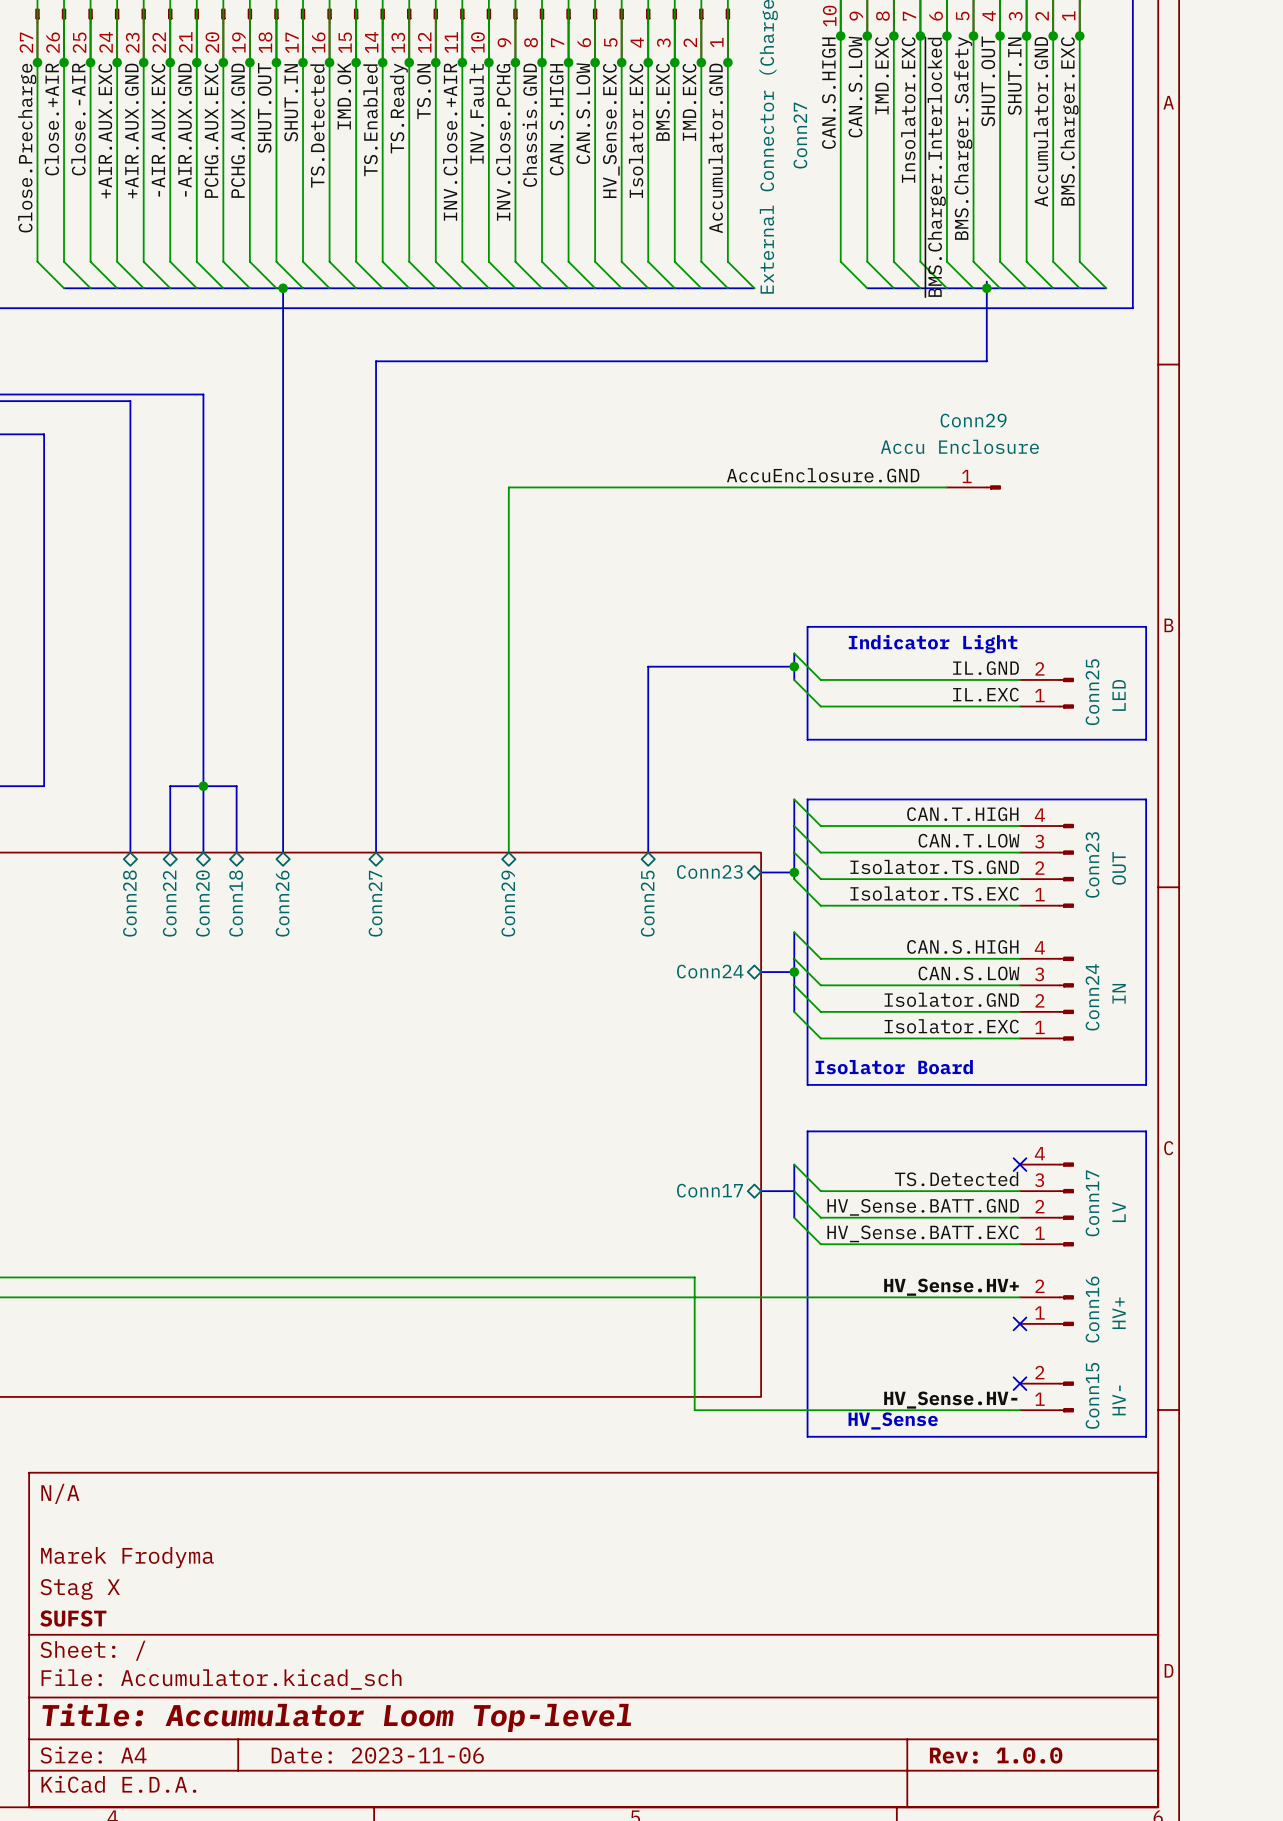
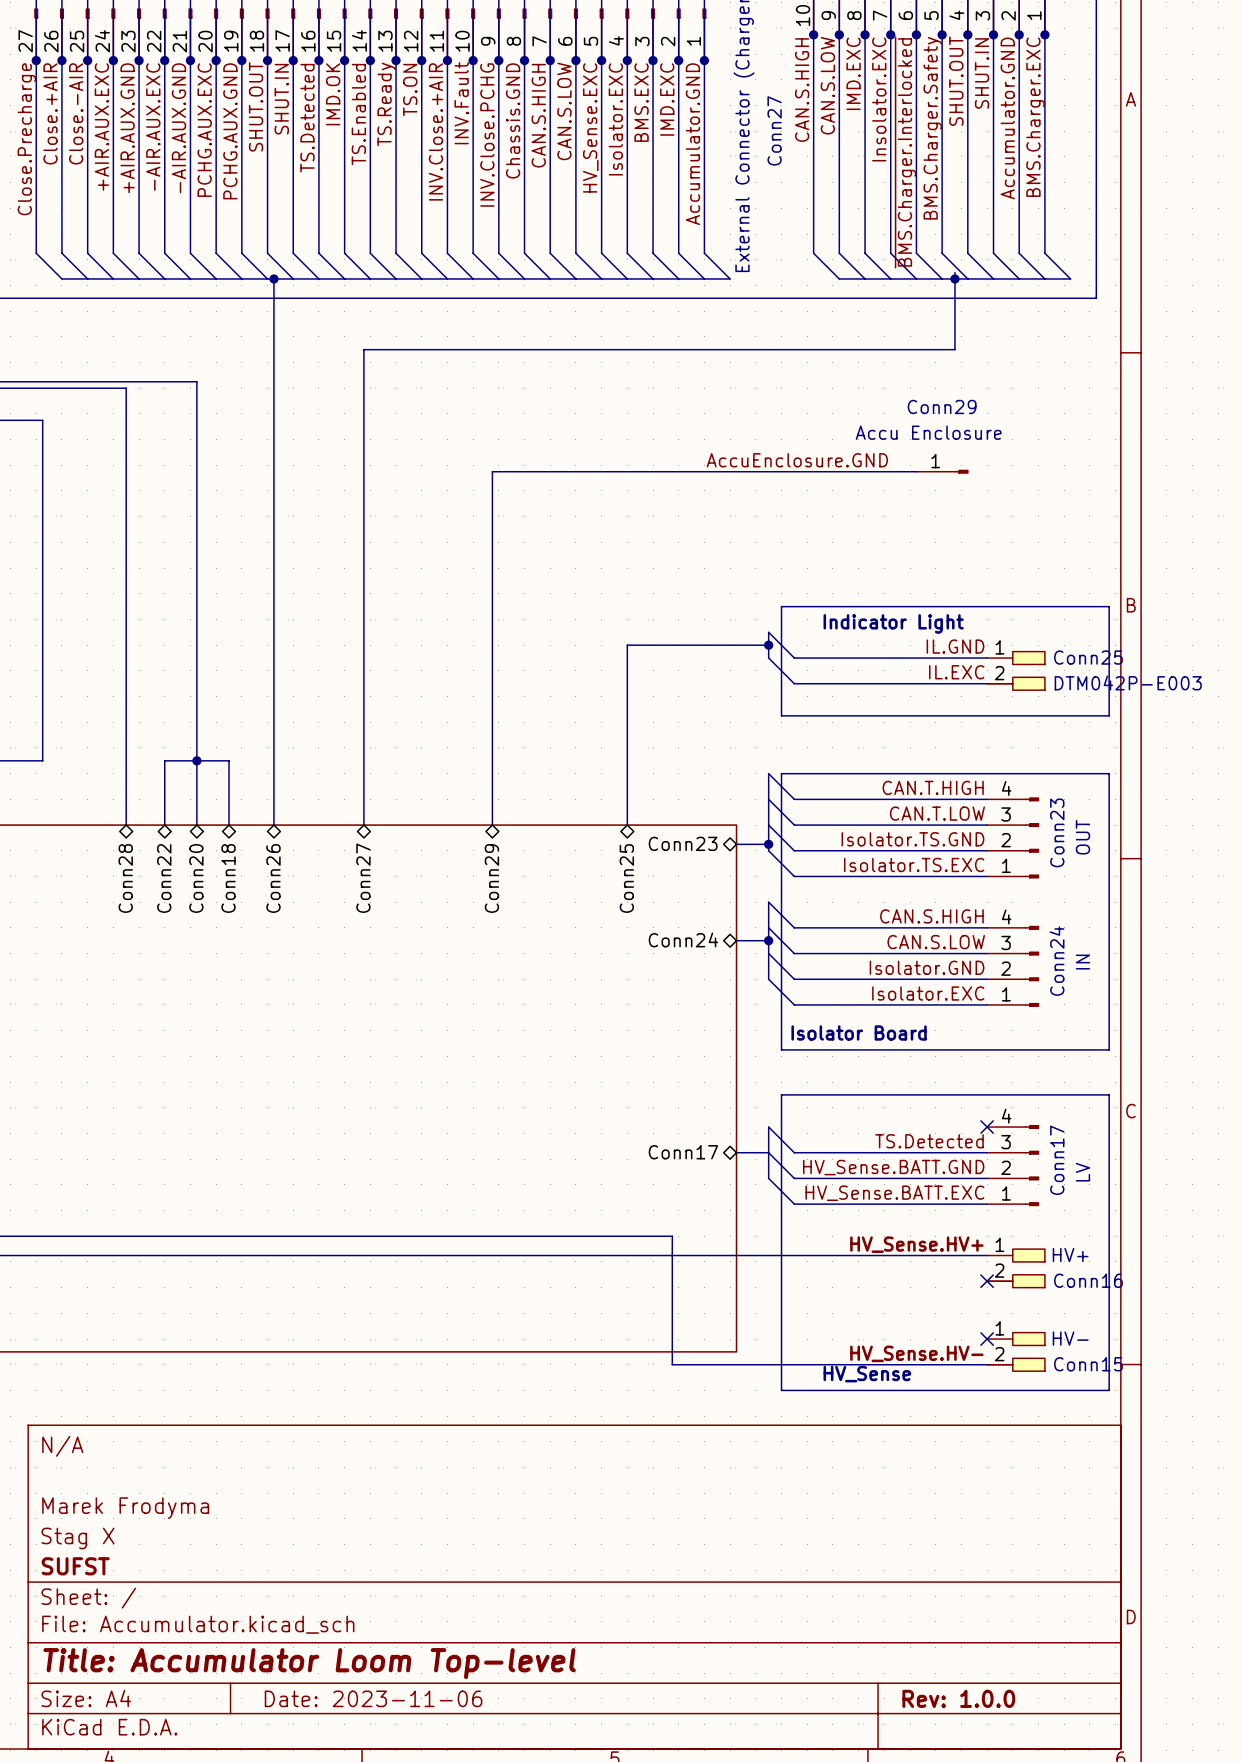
Conn25 symbol: [1019, 677, 1074, 709] -> [987, 651, 1045, 691]
Conn25 name position: Conn25 (1092, 692) -> Conn25 (1088, 657)
Conn25 value: LED (1119, 695) -> none
Conn25 text: none -> DTM042P-E003 (1128, 682)
Conn16 symbol: [1019, 1295, 1074, 1327] -> [987, 1249, 1045, 1288]
Conn16 text: none -> HV+ (1070, 1255)
Conn16 name position: Conn16 (1092, 1309) -> Conn16 (1088, 1280)
Conn16 value: HV+ (1119, 1313) -> none
Conn15 symbol: [1019, 1381, 1074, 1413] -> [987, 1332, 1045, 1372]
Conn15 text: none -> HV- (1070, 1338)
Conn15 name position: Conn15 (1092, 1395) -> Conn15 (1088, 1364)
Conn15 value: HV- (1119, 1400) -> none

